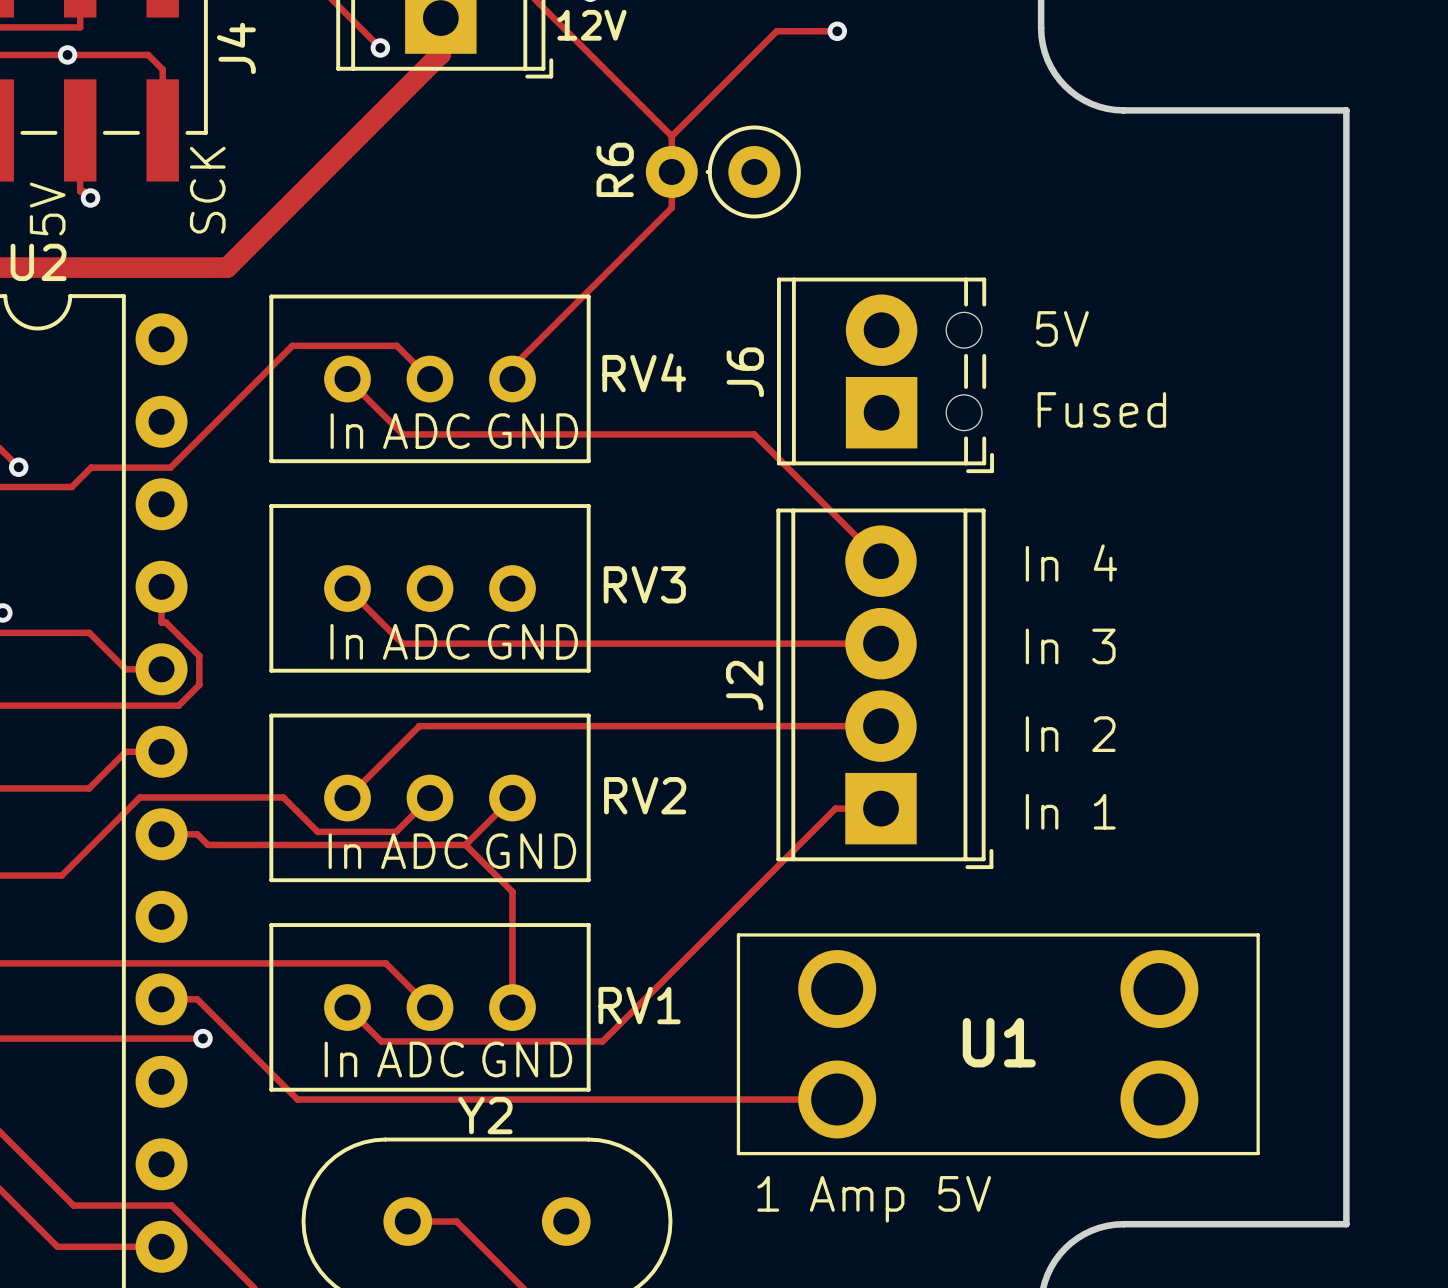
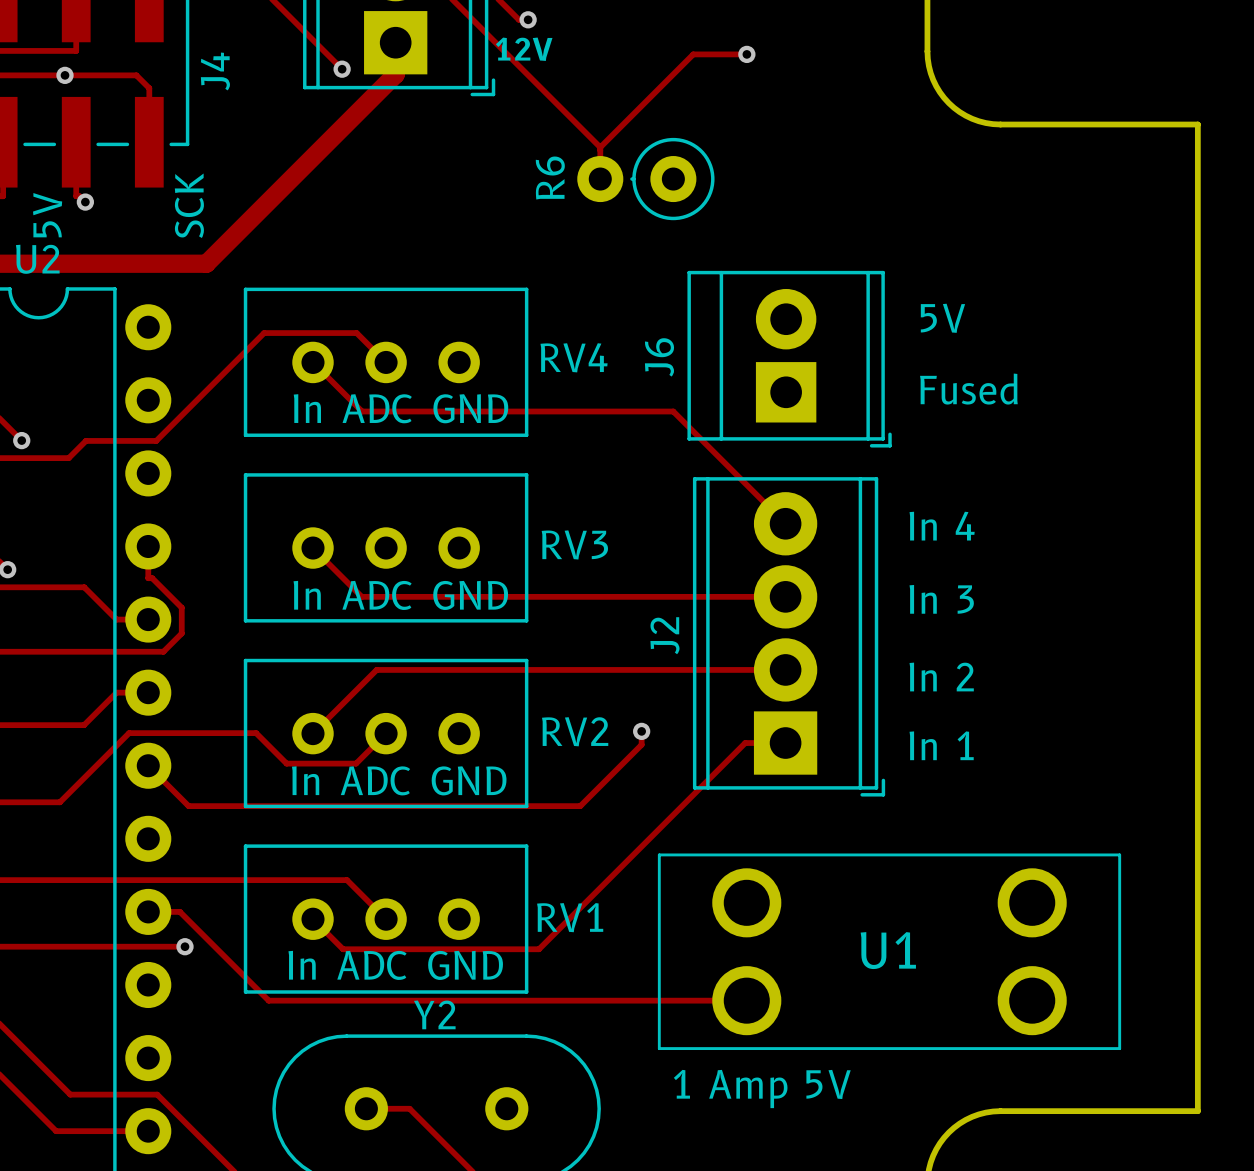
track: (671, 171) (671, 207) (512, 367) -> none
J6 footprint: [777, 277, 994, 474] -> [687, 270, 892, 448]
via: none -> (641, 731)
track: (512, 798) (465, 844) -> none
track: (161, 834) (197, 834) (207, 844) (465, 844) -> (148, 765) (188, 806) (580, 806) (641, 744) (641, 731)
track: (465, 844) (512, 891) (512, 1007) -> none

